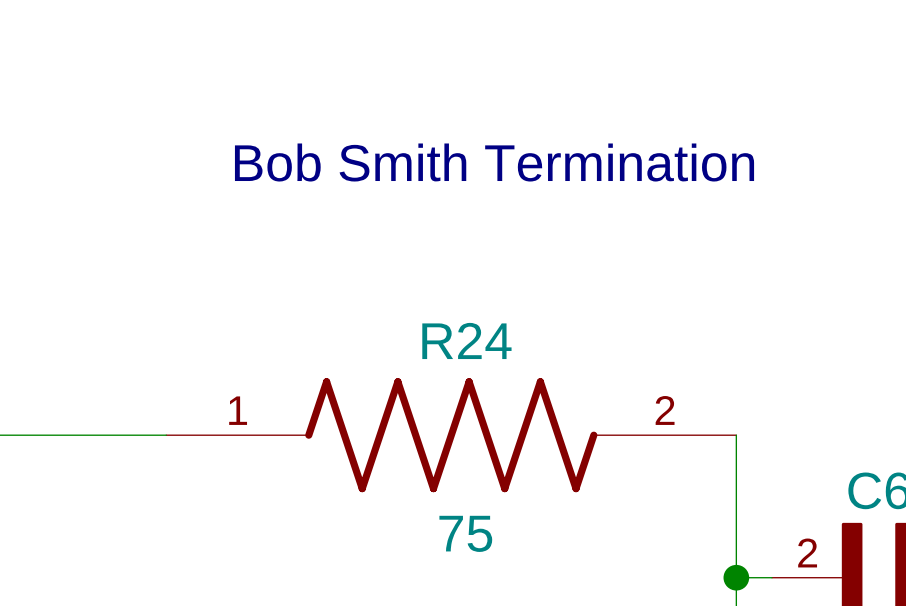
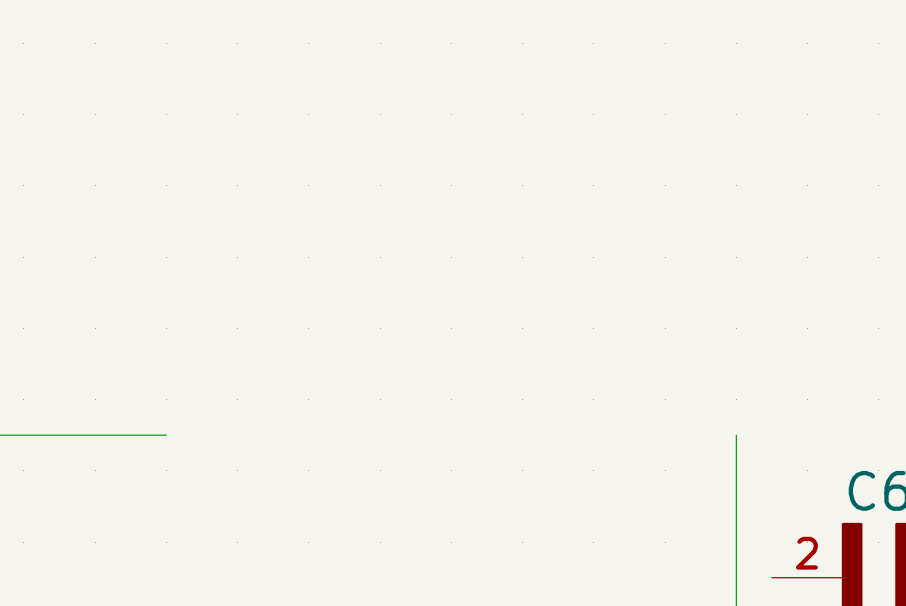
text: Bob Smith Termination (494, 162) -> none
R24: 75 (451, 435) -> none
wire: (736, 577) (771, 577) -> none
junction: (736, 577) -> none

